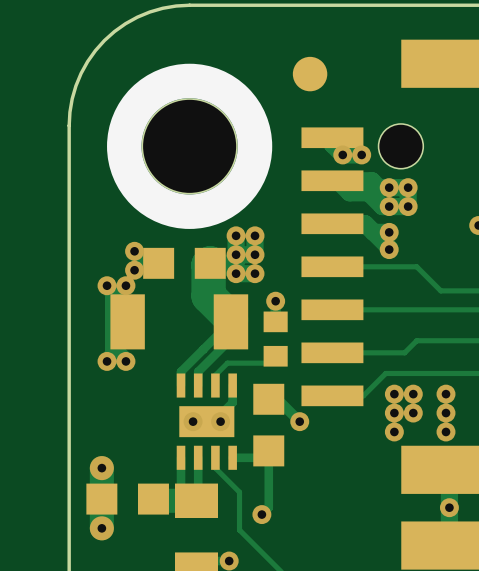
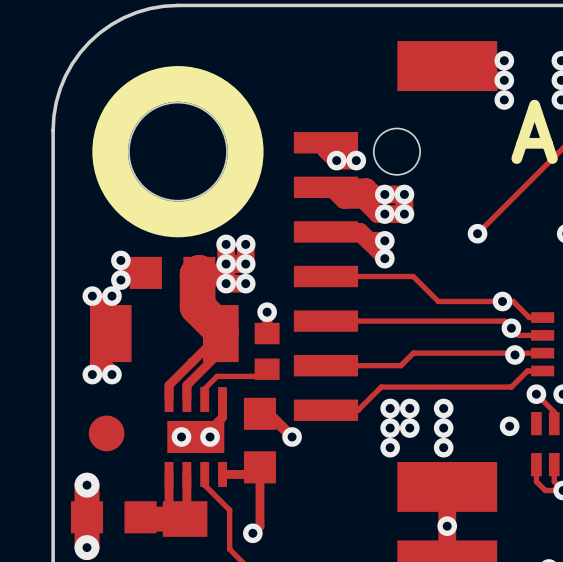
part position: (310, 74) -> (106, 433)

